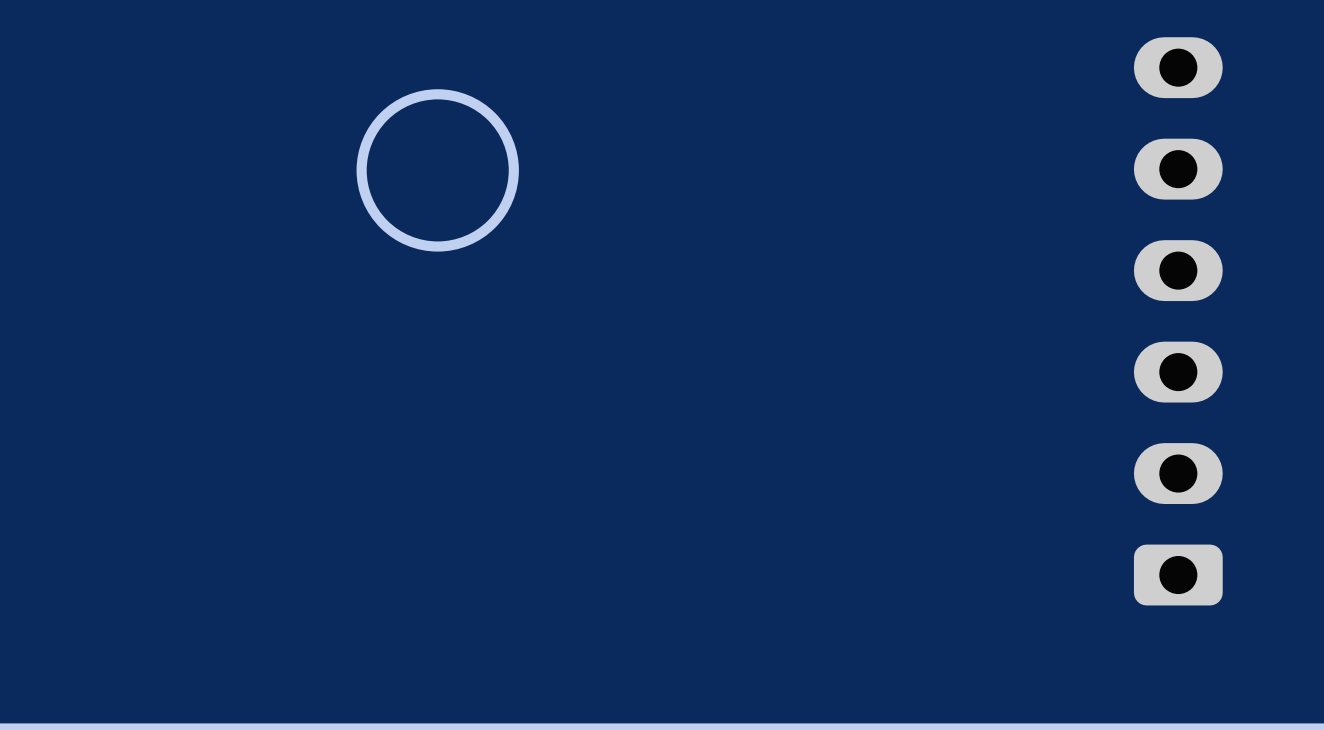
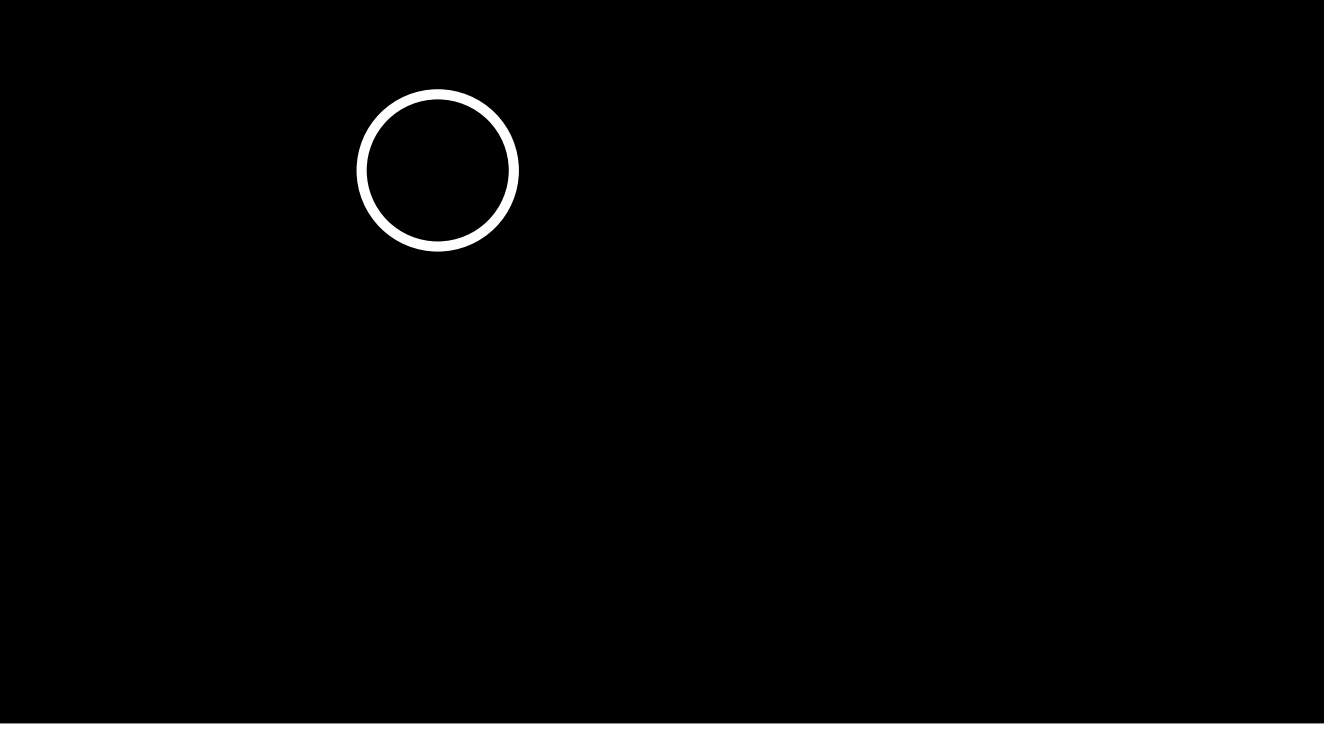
part: (1178, 321) -> none

